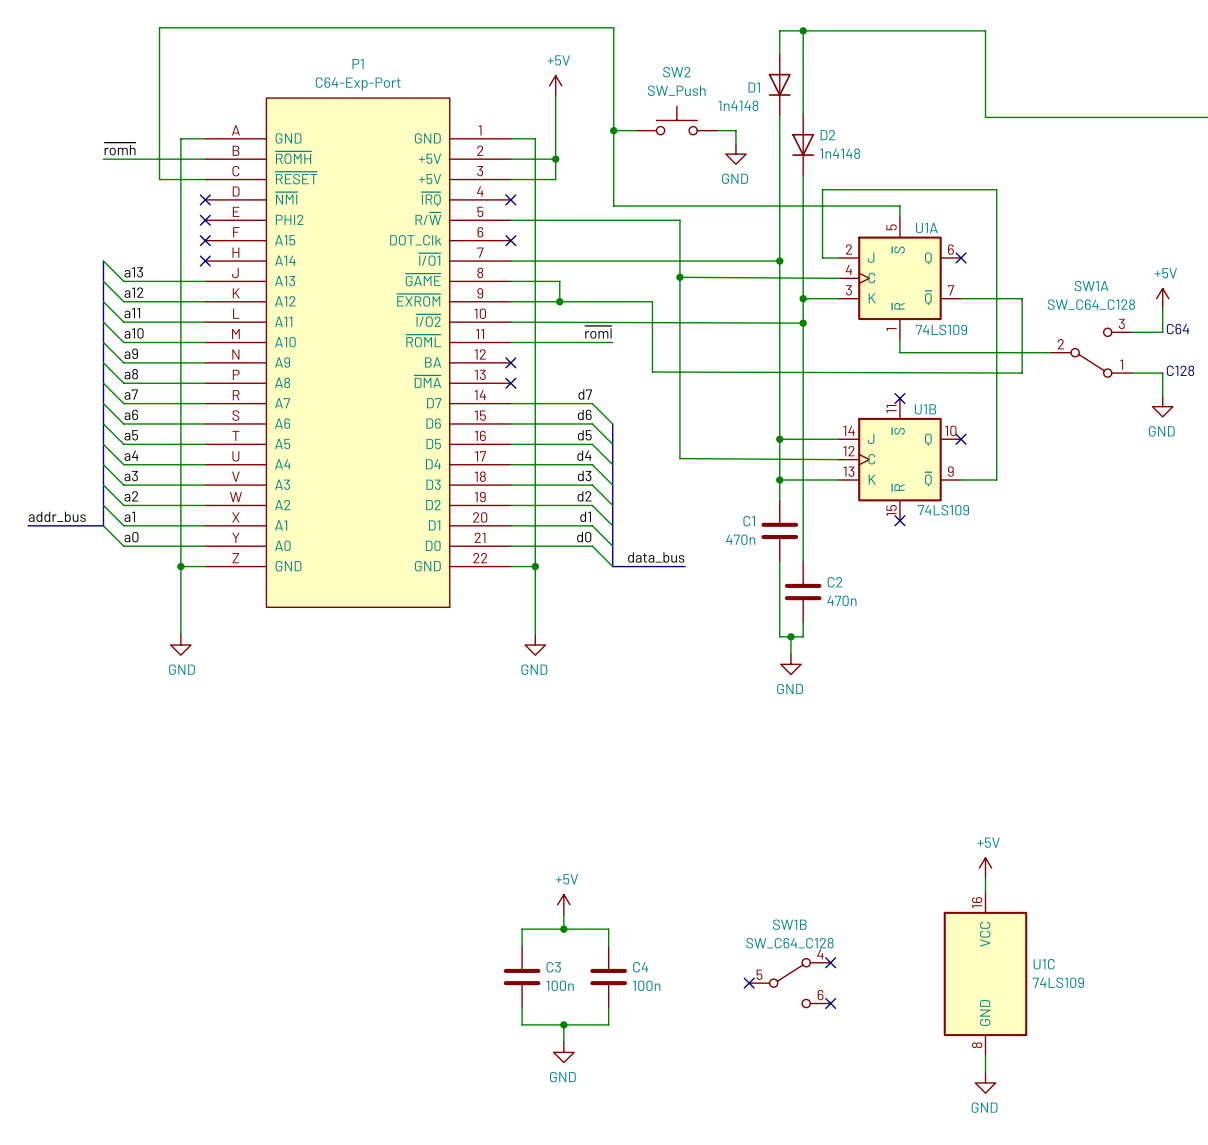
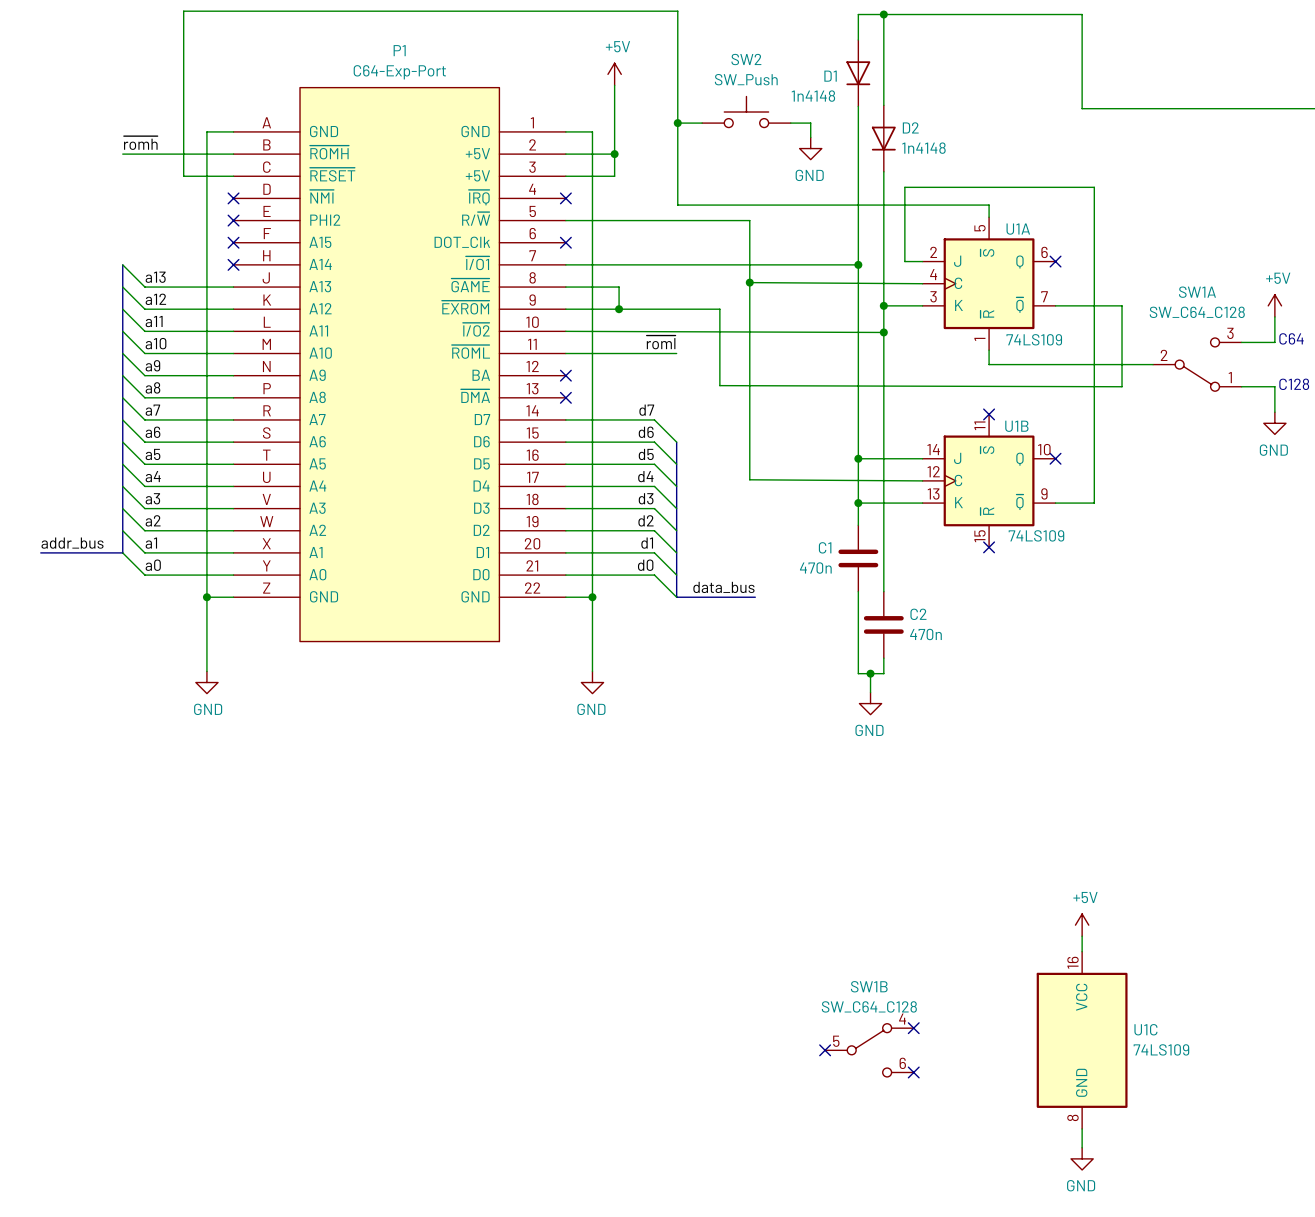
power symbol: +5V (563, 904) -> none
wire: (563, 914) (563, 929) -> none
junction: (563, 929) -> none
wire: (522, 946) (522, 929) (608, 929) (608, 946) -> none
C3: 100n (522, 977) -> none
C4: 100n (608, 977) -> none
wire: (522, 1007) (522, 1024) (608, 1024) (608, 1007) -> none
wire: (563, 1024) (563, 1042) -> none
junction: (563, 1024) -> none
power symbol: GND (563, 1052) -> none

